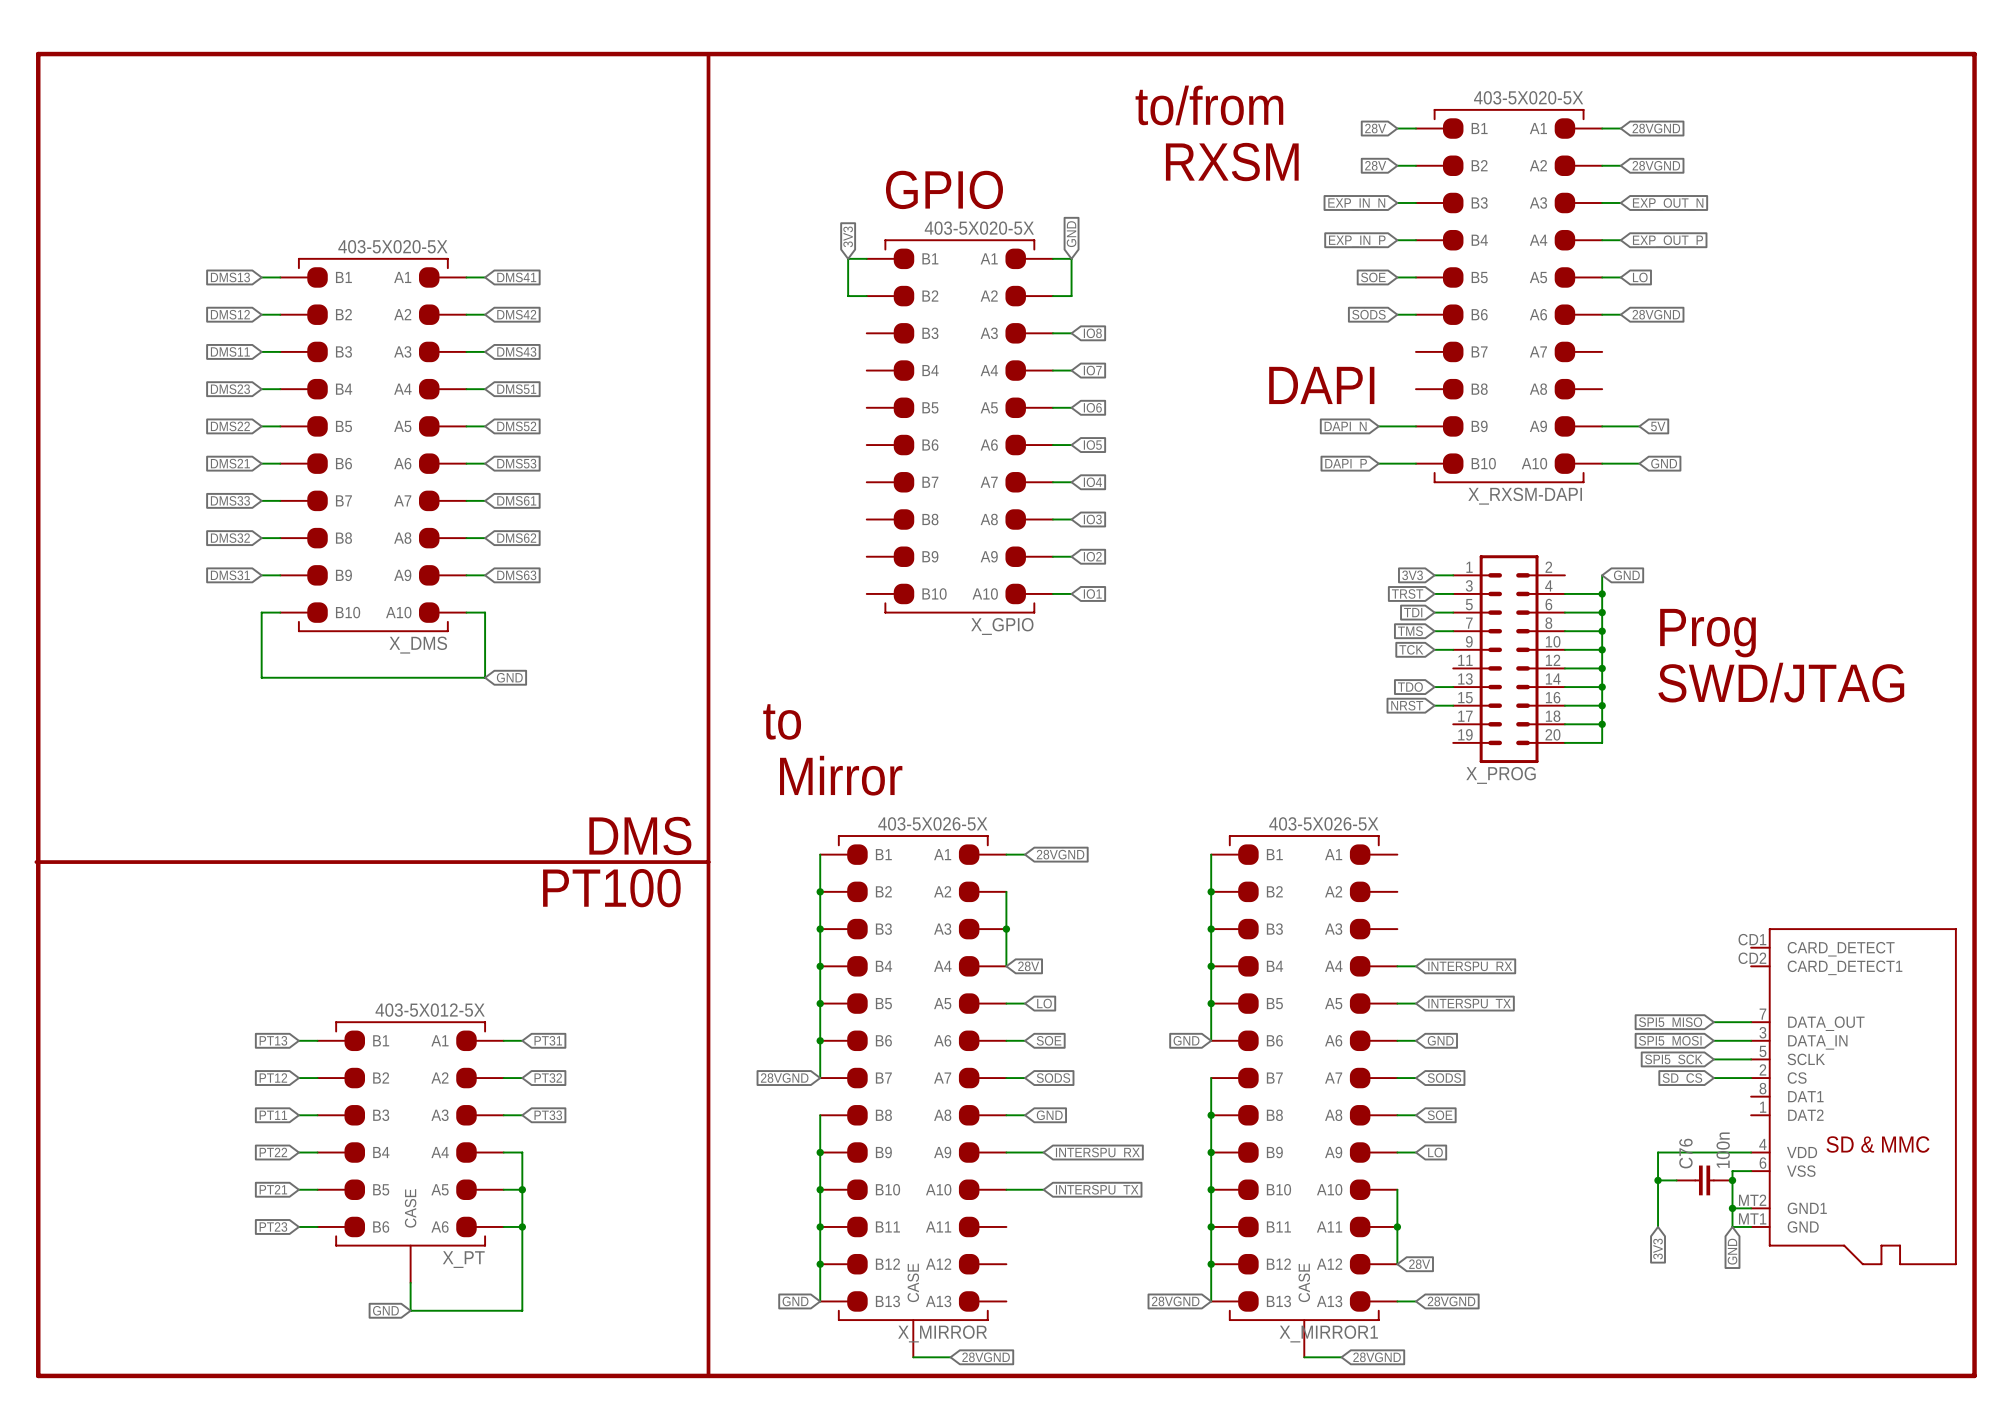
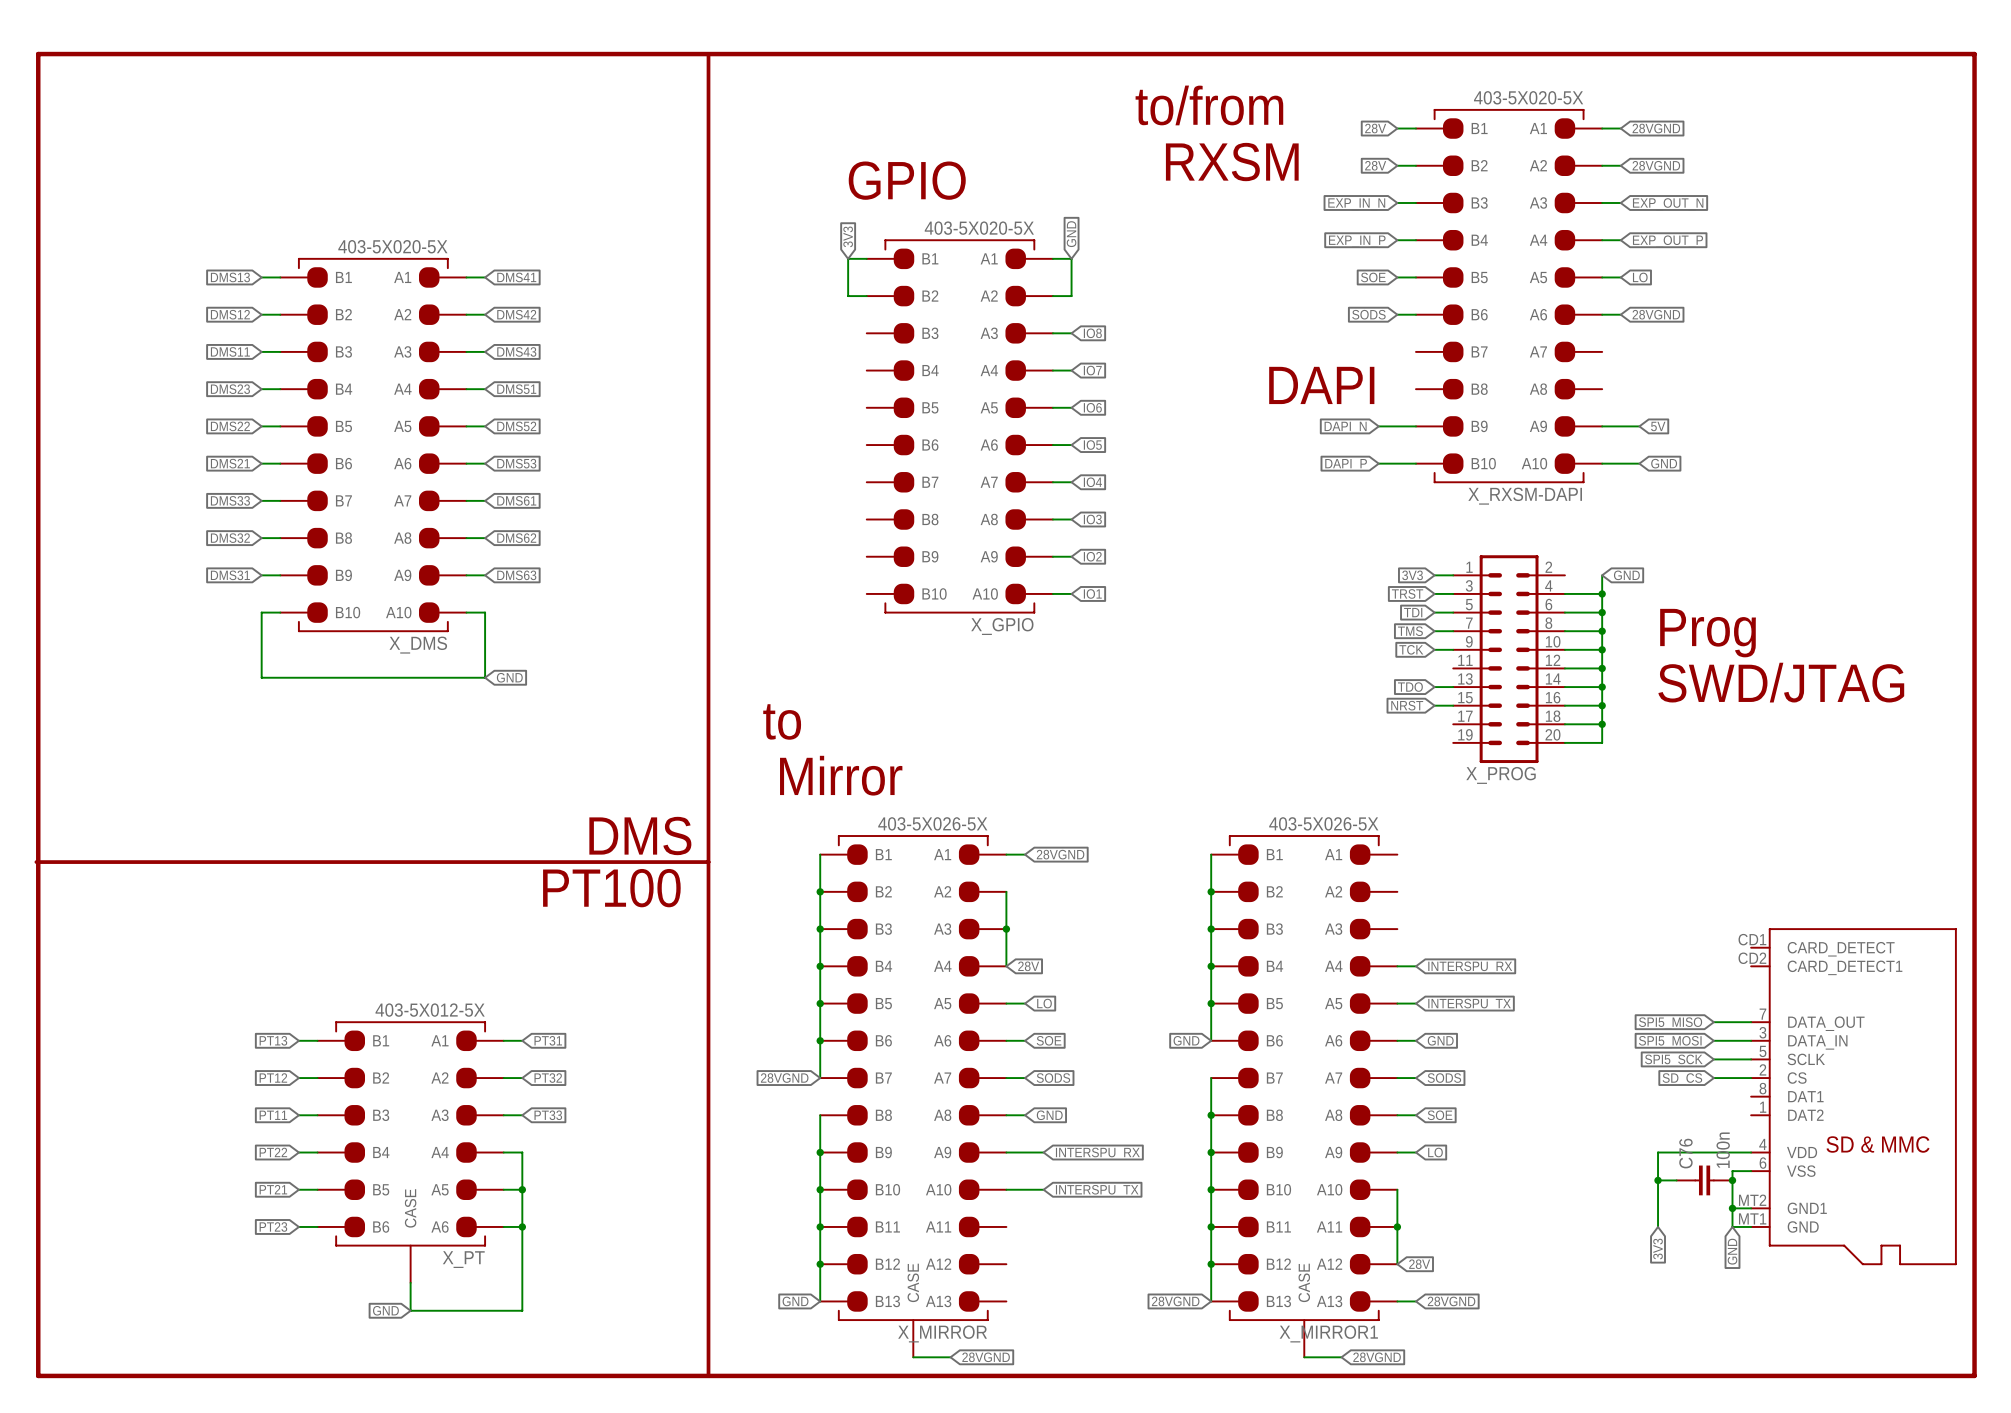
text position: GPIO (944, 189) -> GPIO (907, 180)

